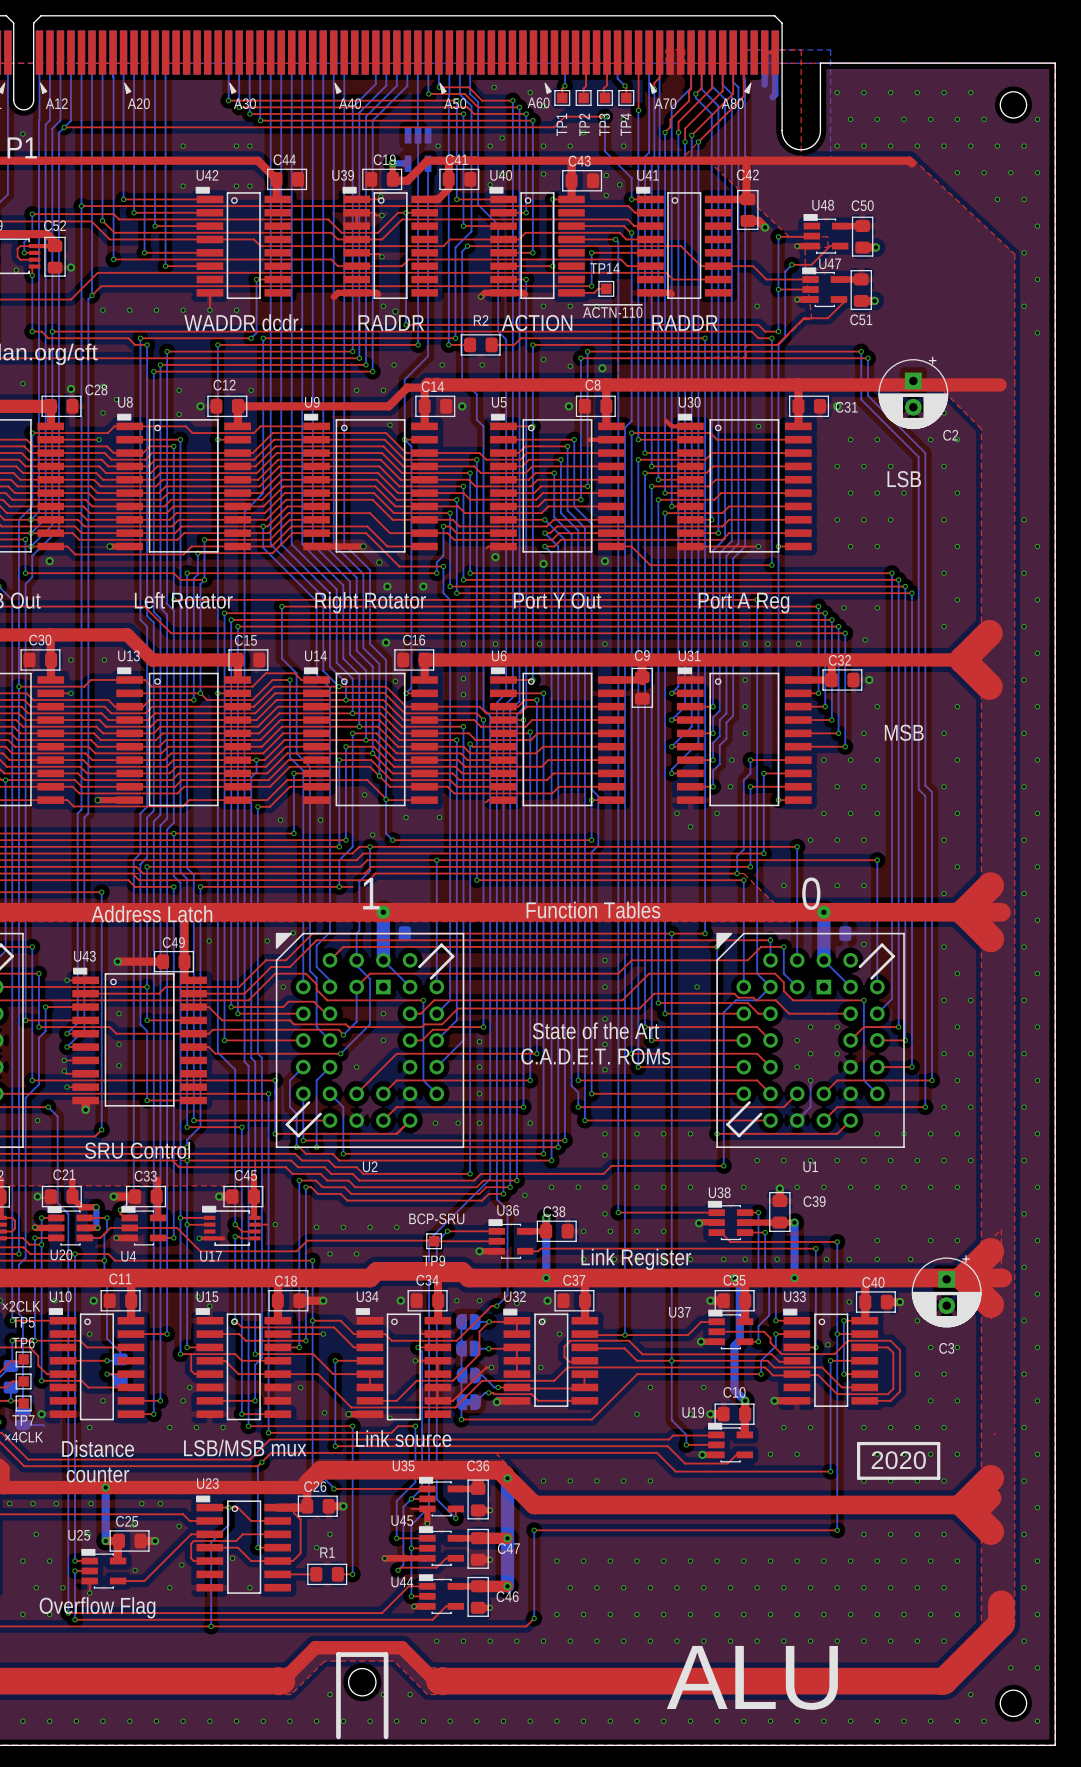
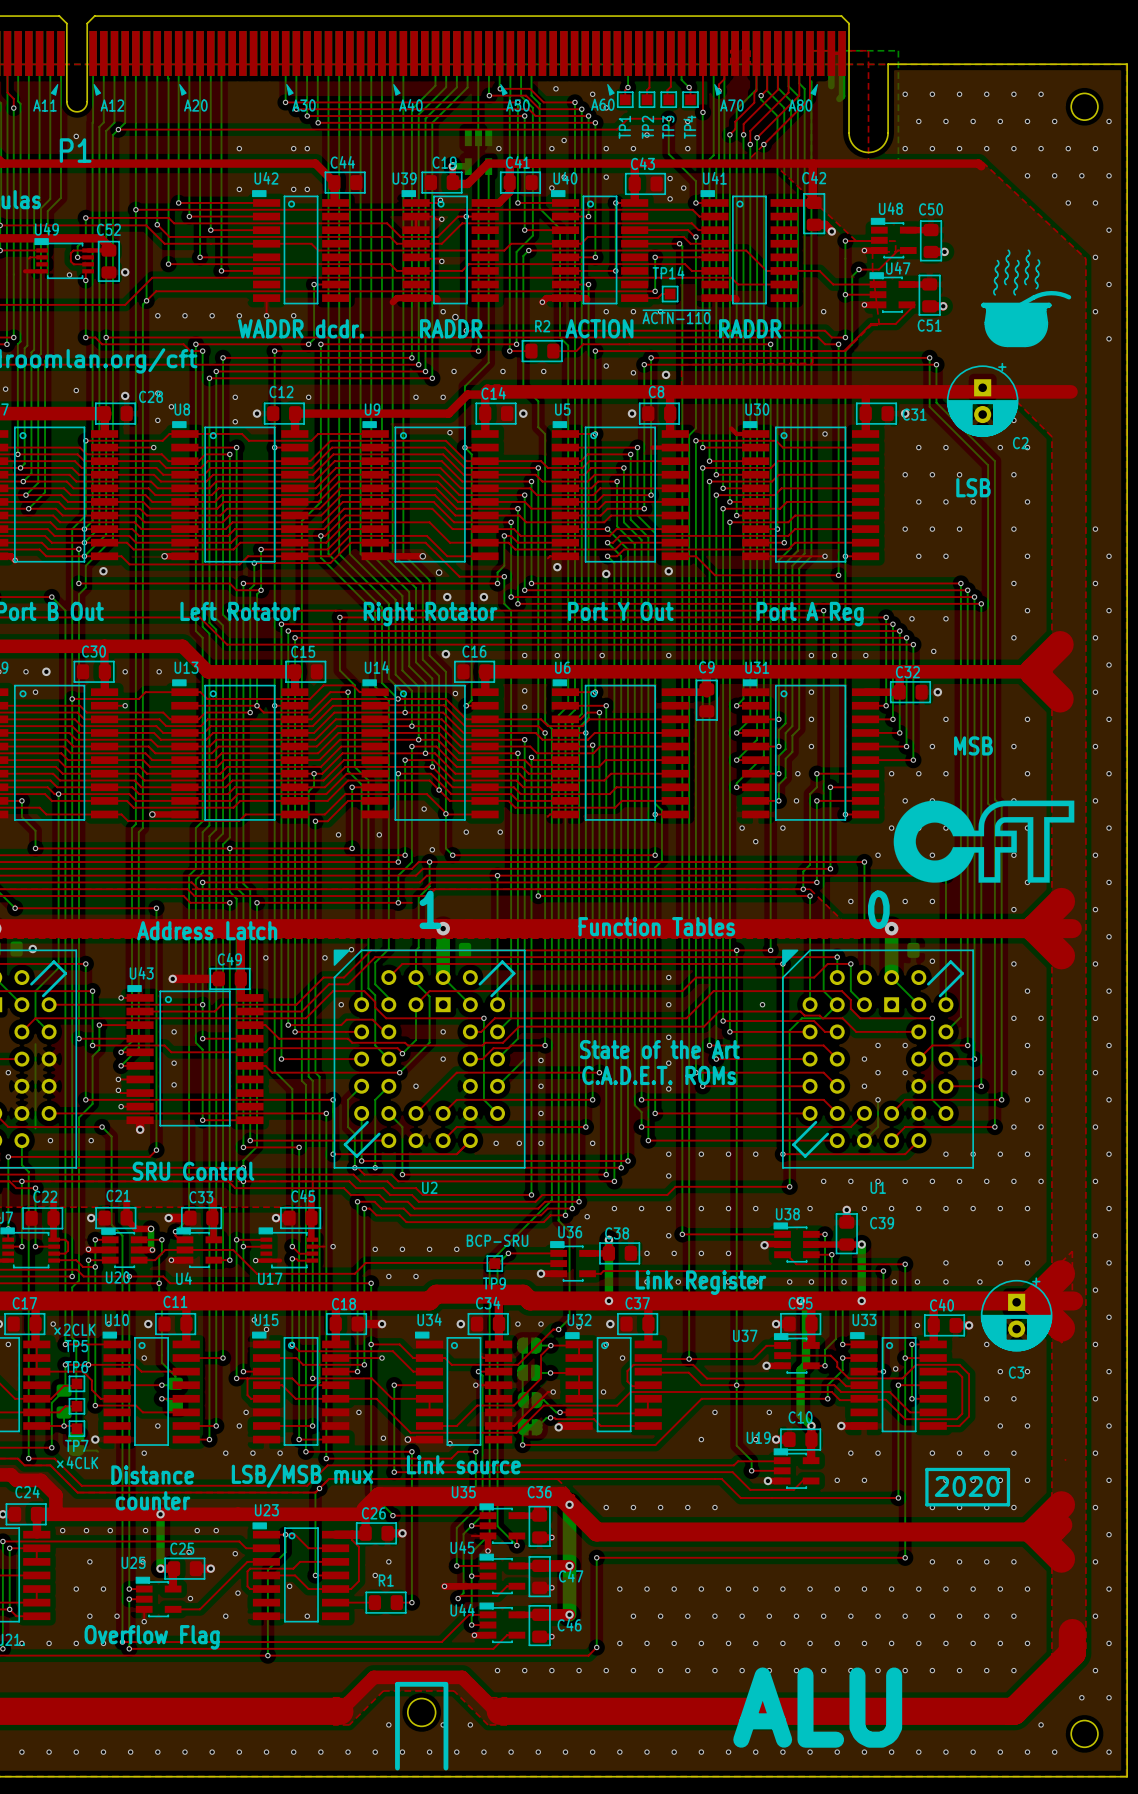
drawing: none -> [981, 249, 1072, 348]
drawing: none -> [893, 800, 1075, 883]

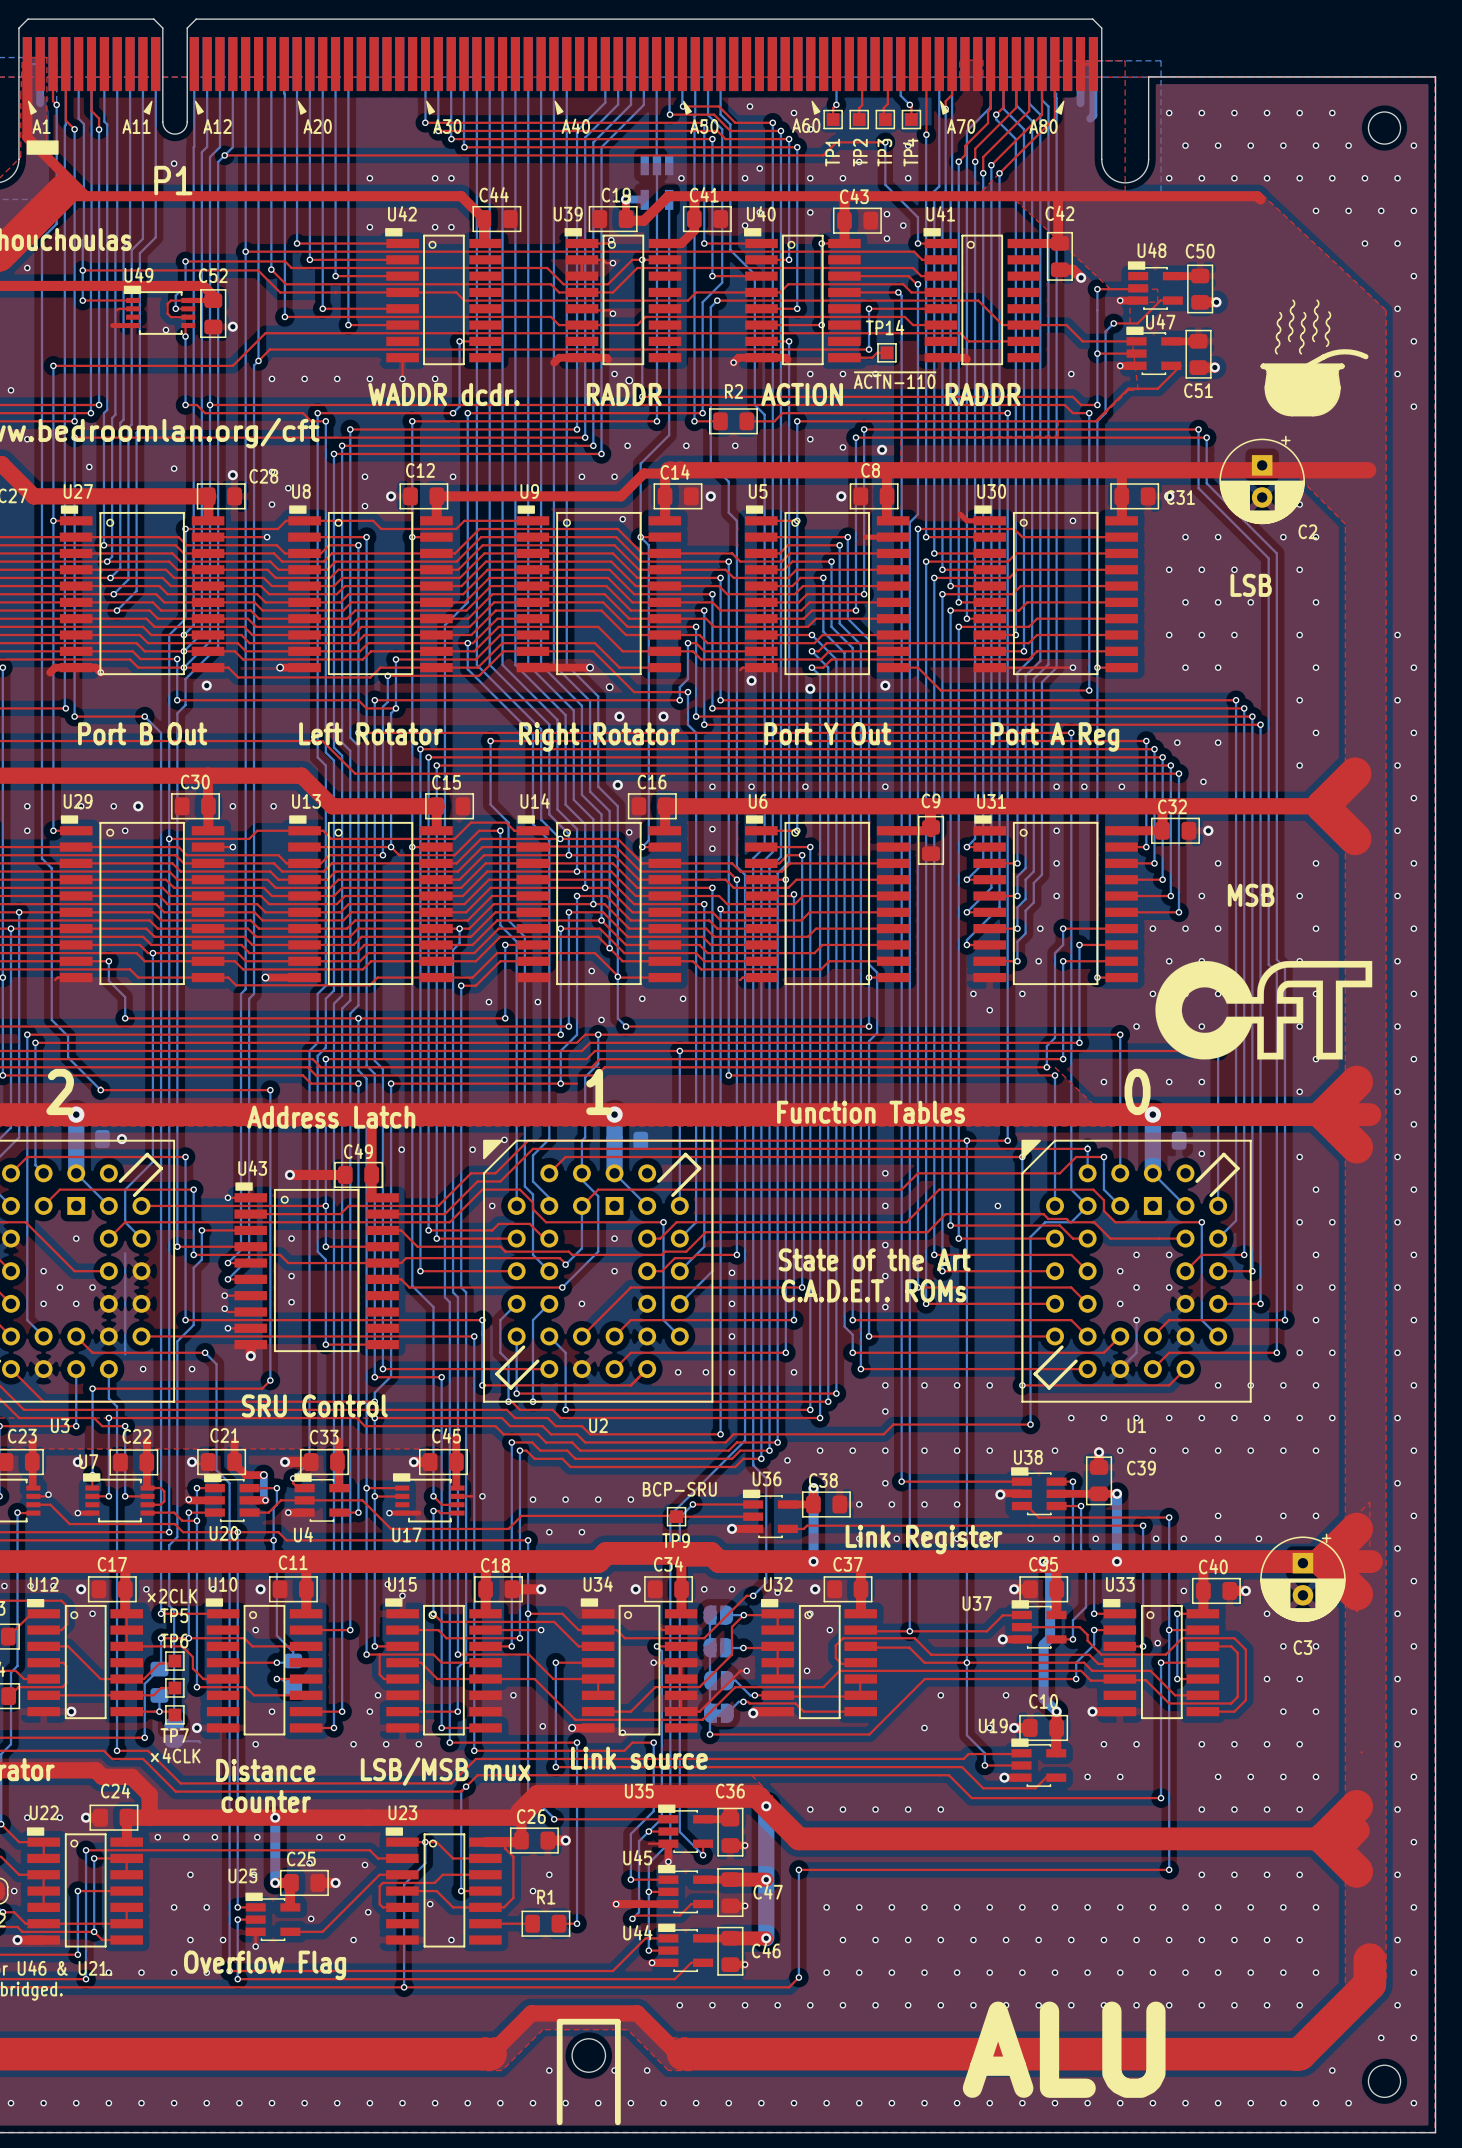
line: (926, 1469) (926, 1504) (1008, 1504) (1008, 1469) (926, 1469) -> none
text: 2020 (967, 1486) -> none

